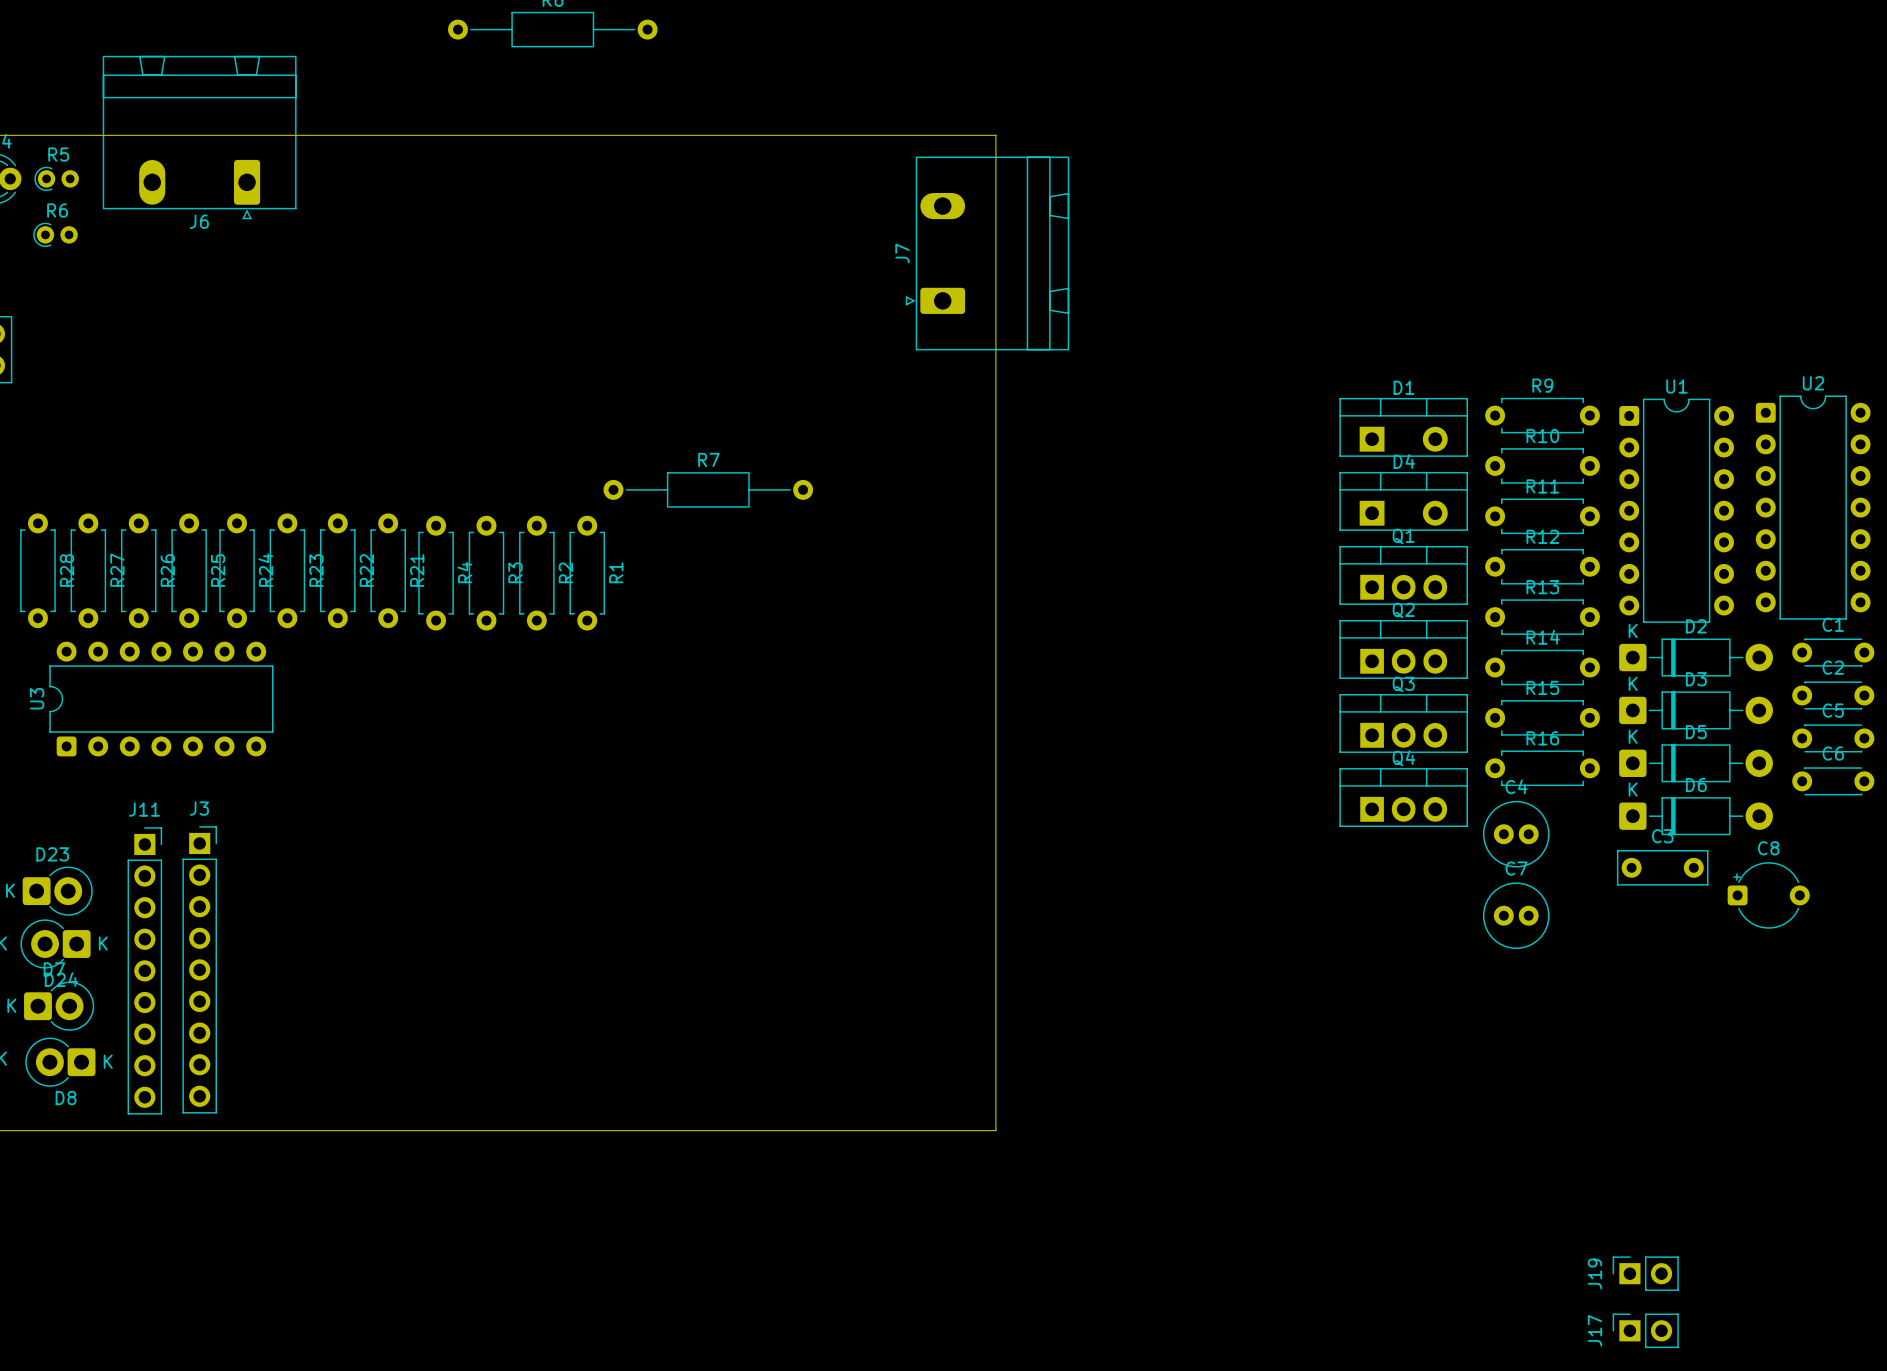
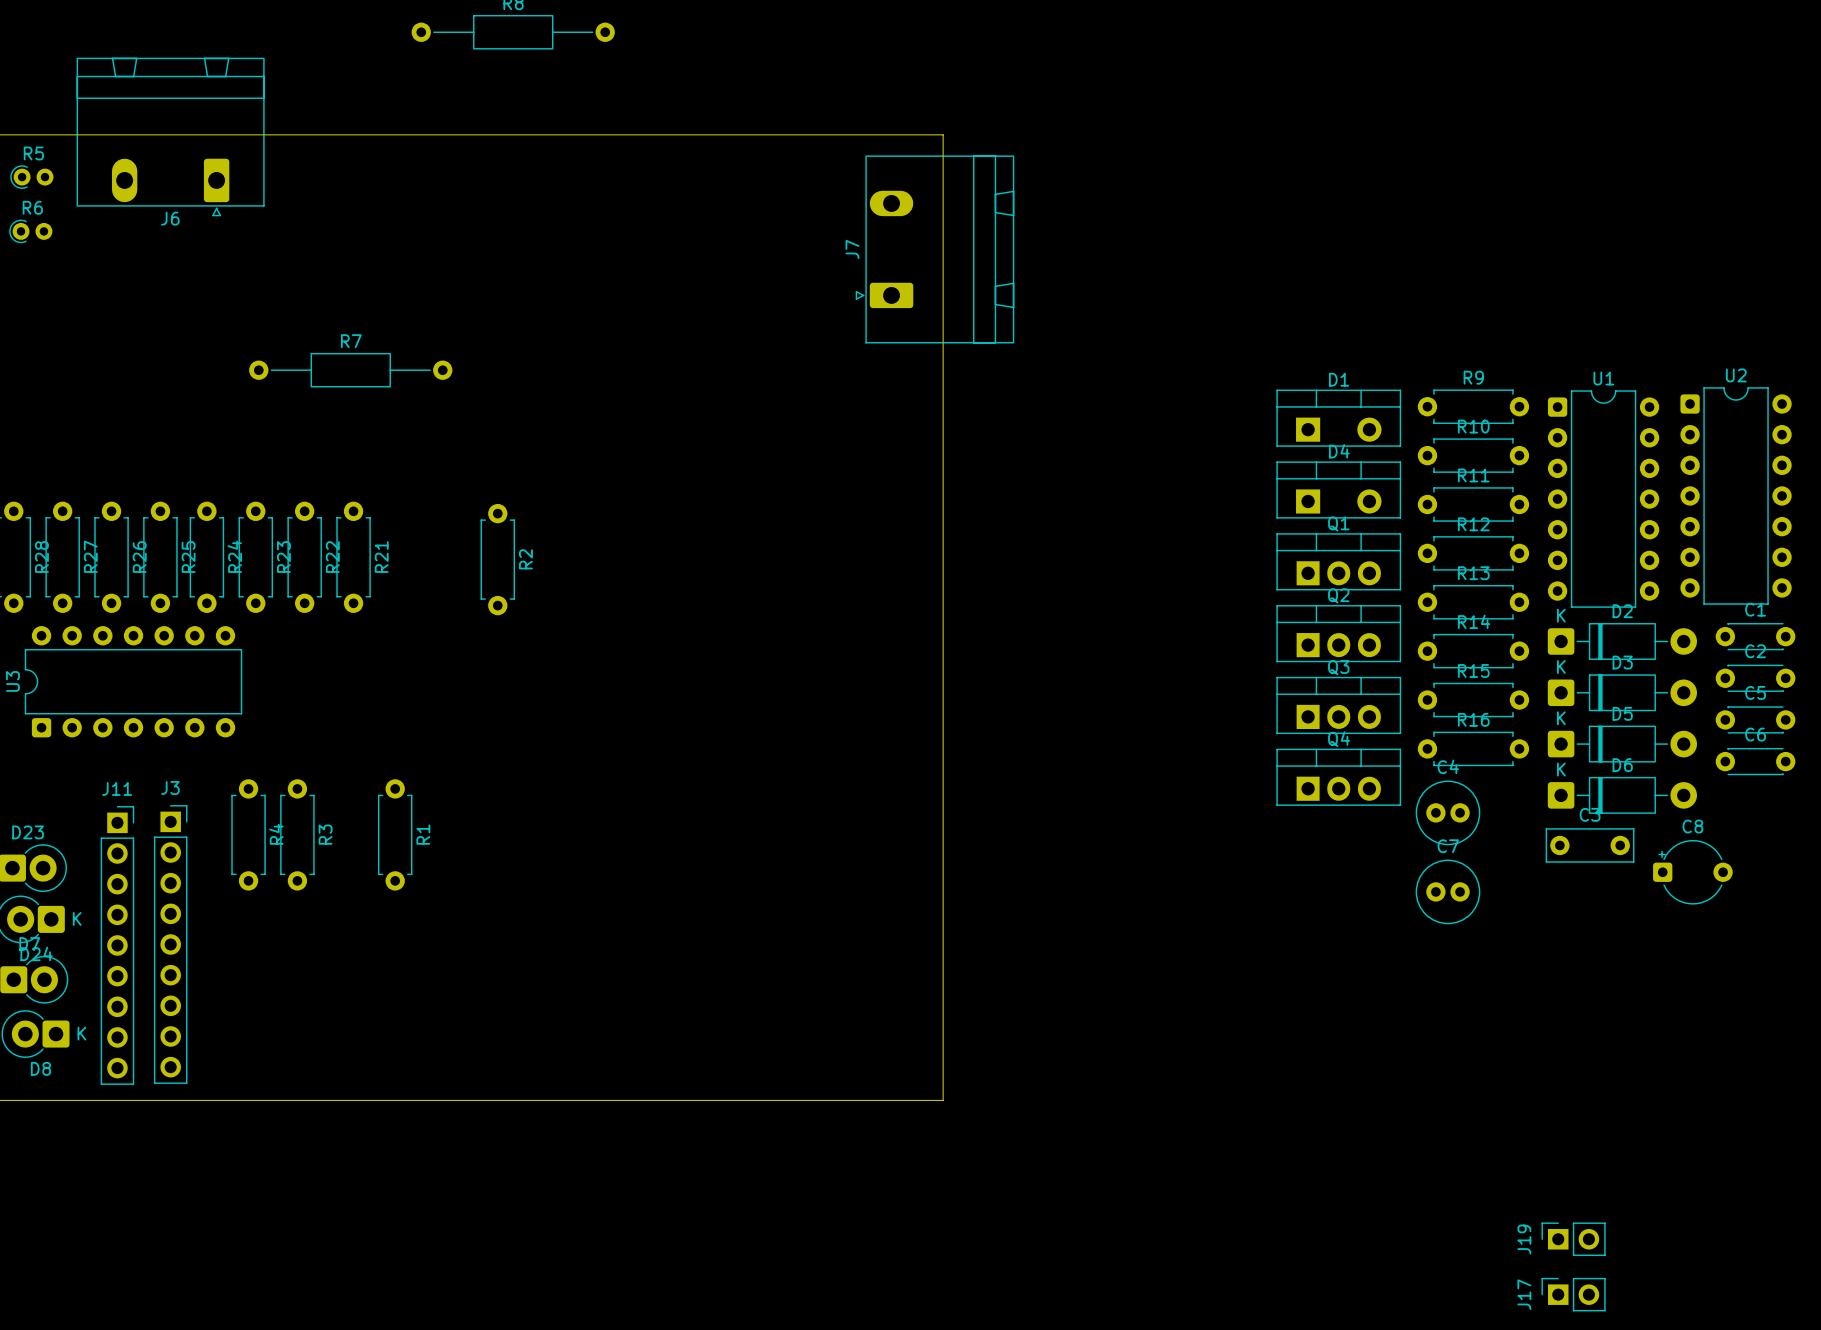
R7 position: (708, 489) -> (350, 370)
R4 position: (436, 573) -> (248, 834)
R3 position: (486, 573) -> (297, 834)
R1 position: (587, 573) -> (395, 834)

